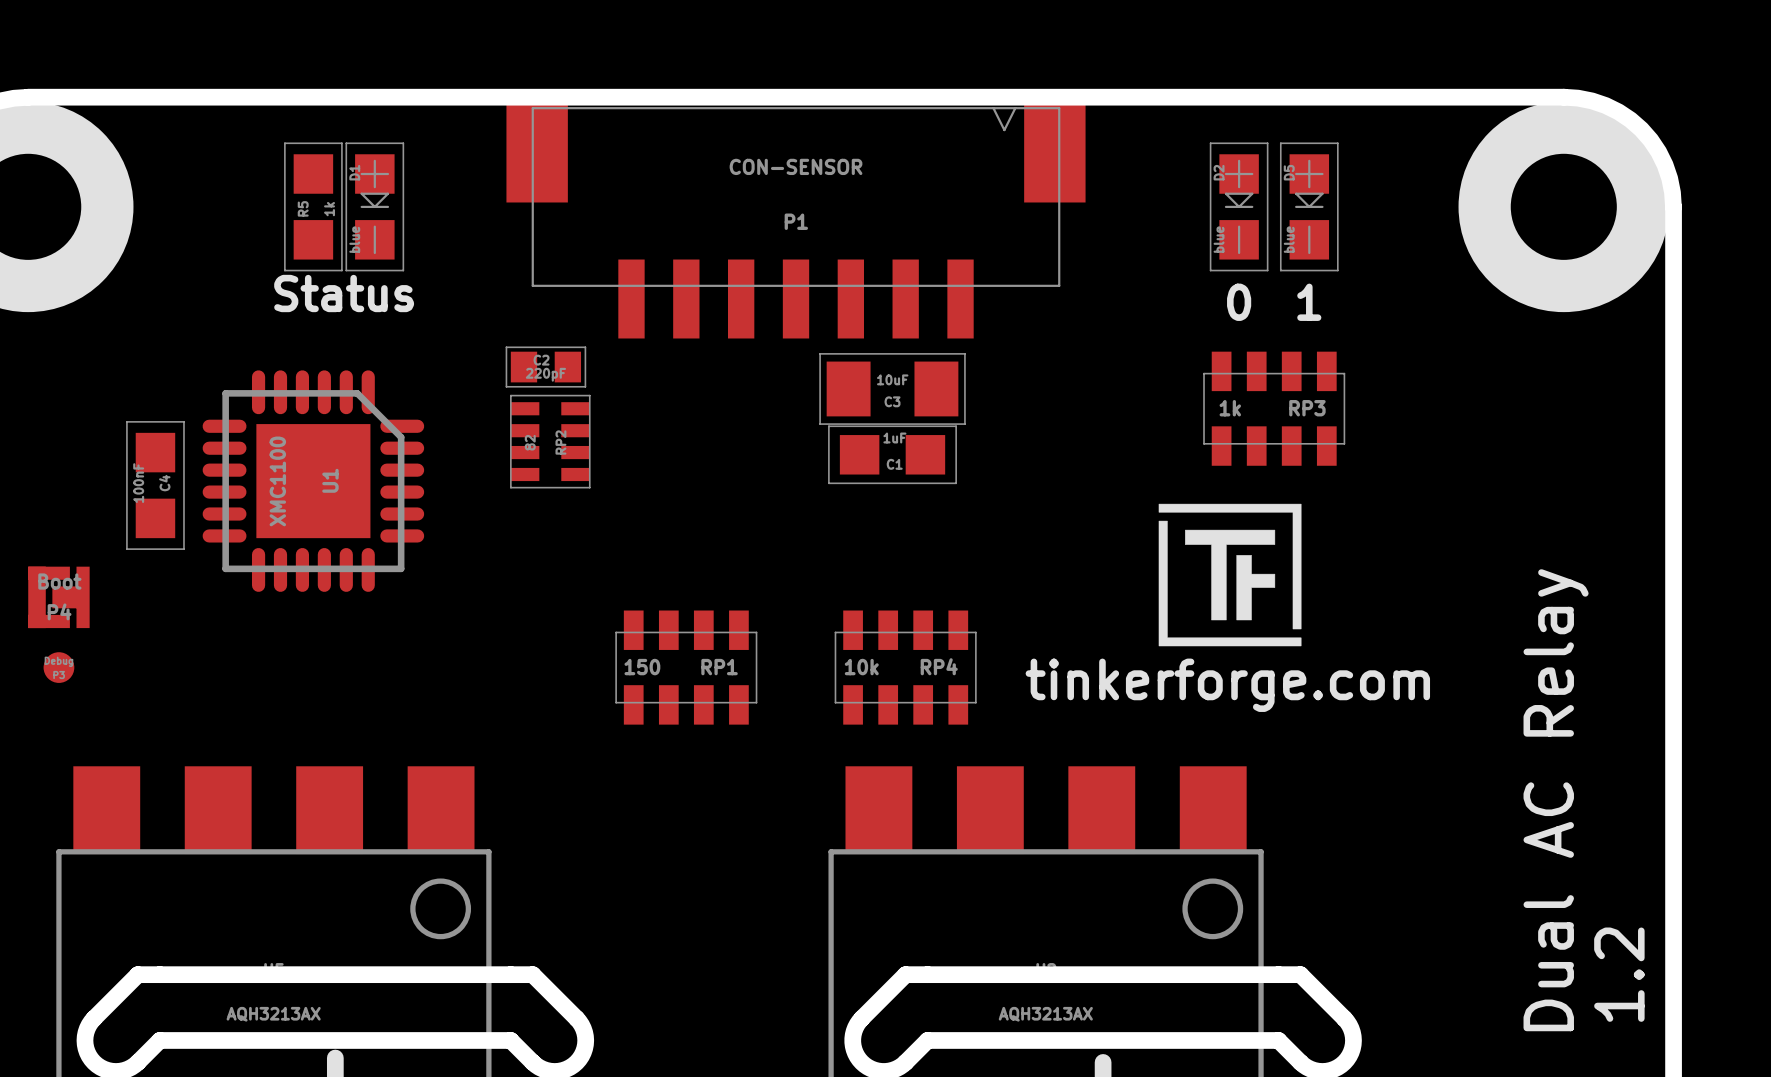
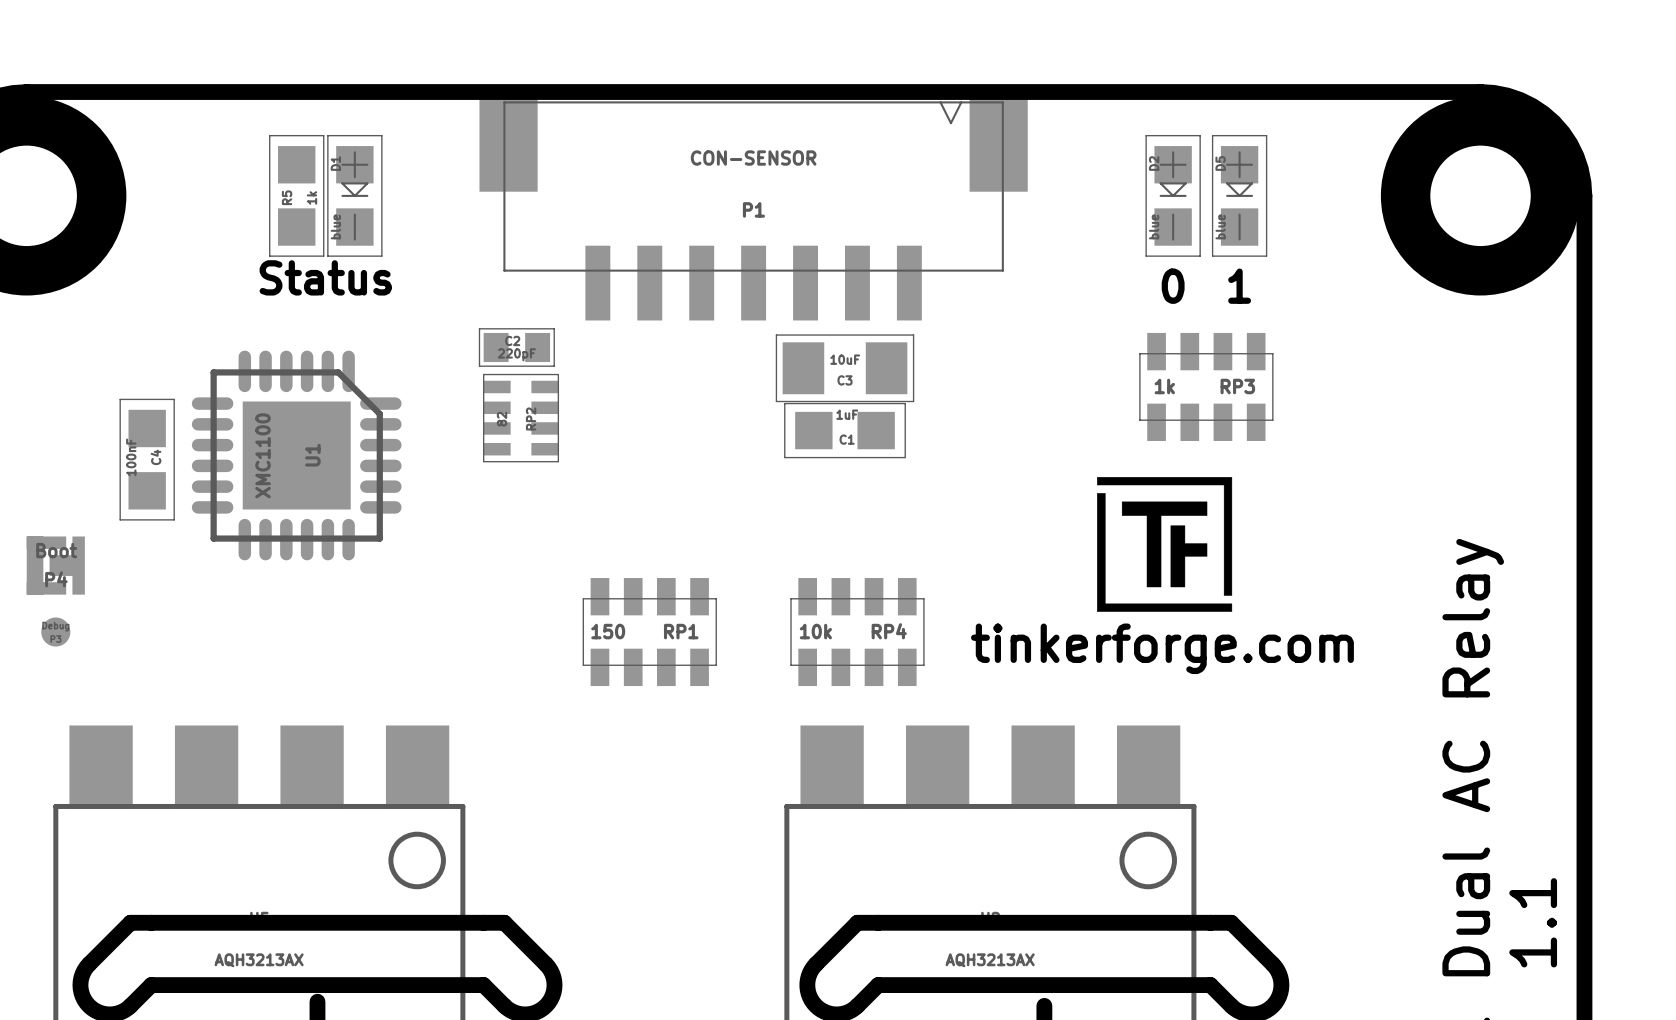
text: 1.2 (1619, 974) -> 1.1 (1533, 922)

